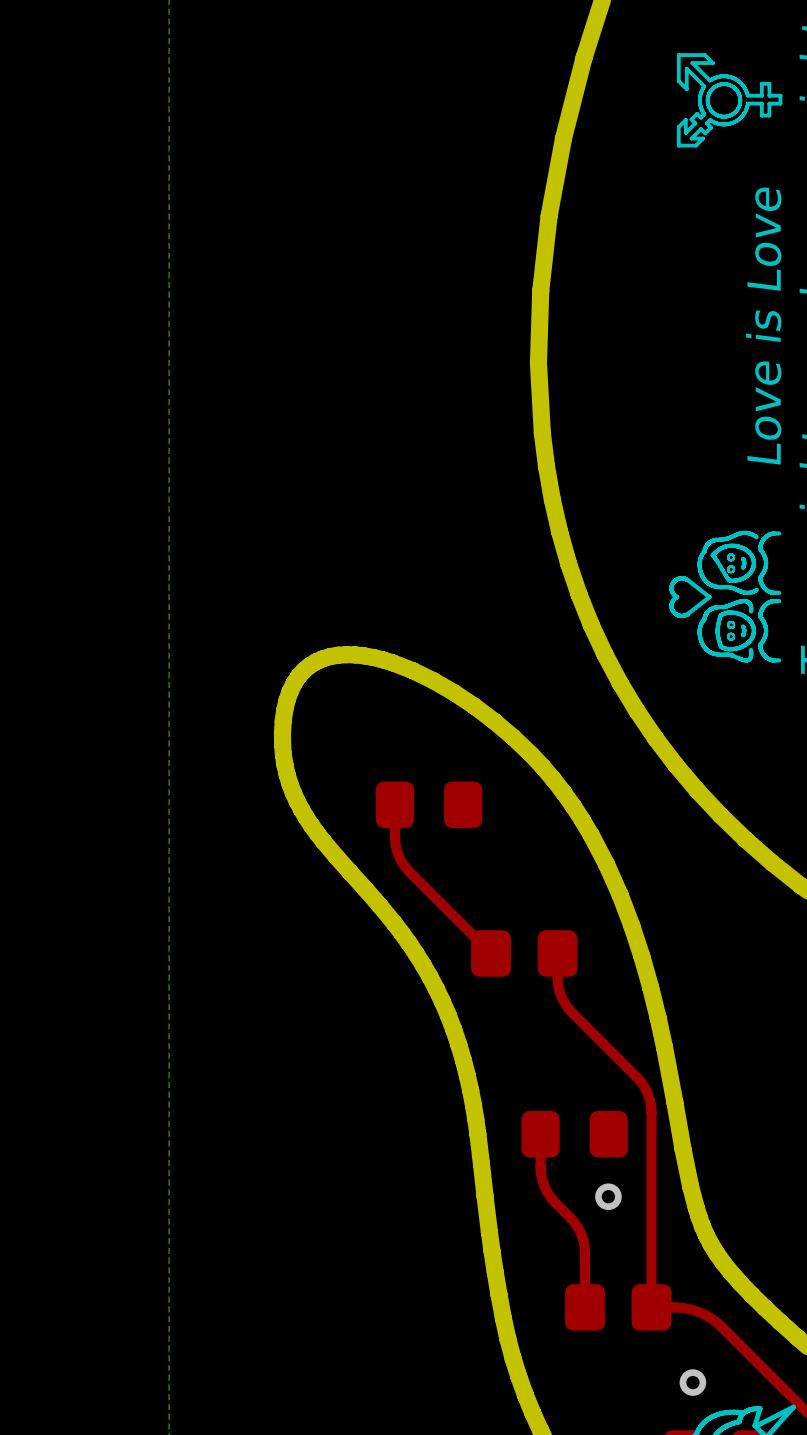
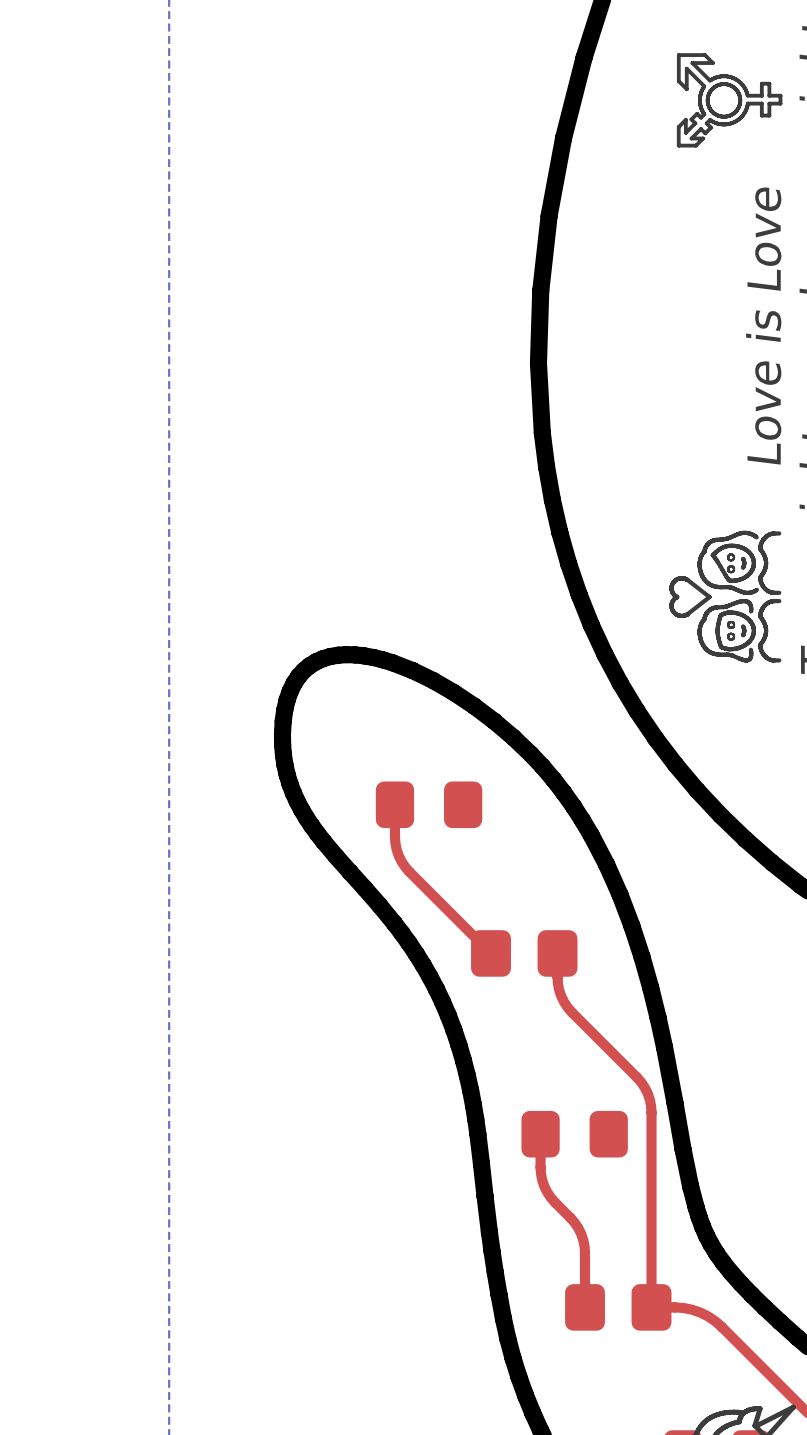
via: (608, 1196) -> none
via: (692, 1382) -> none

